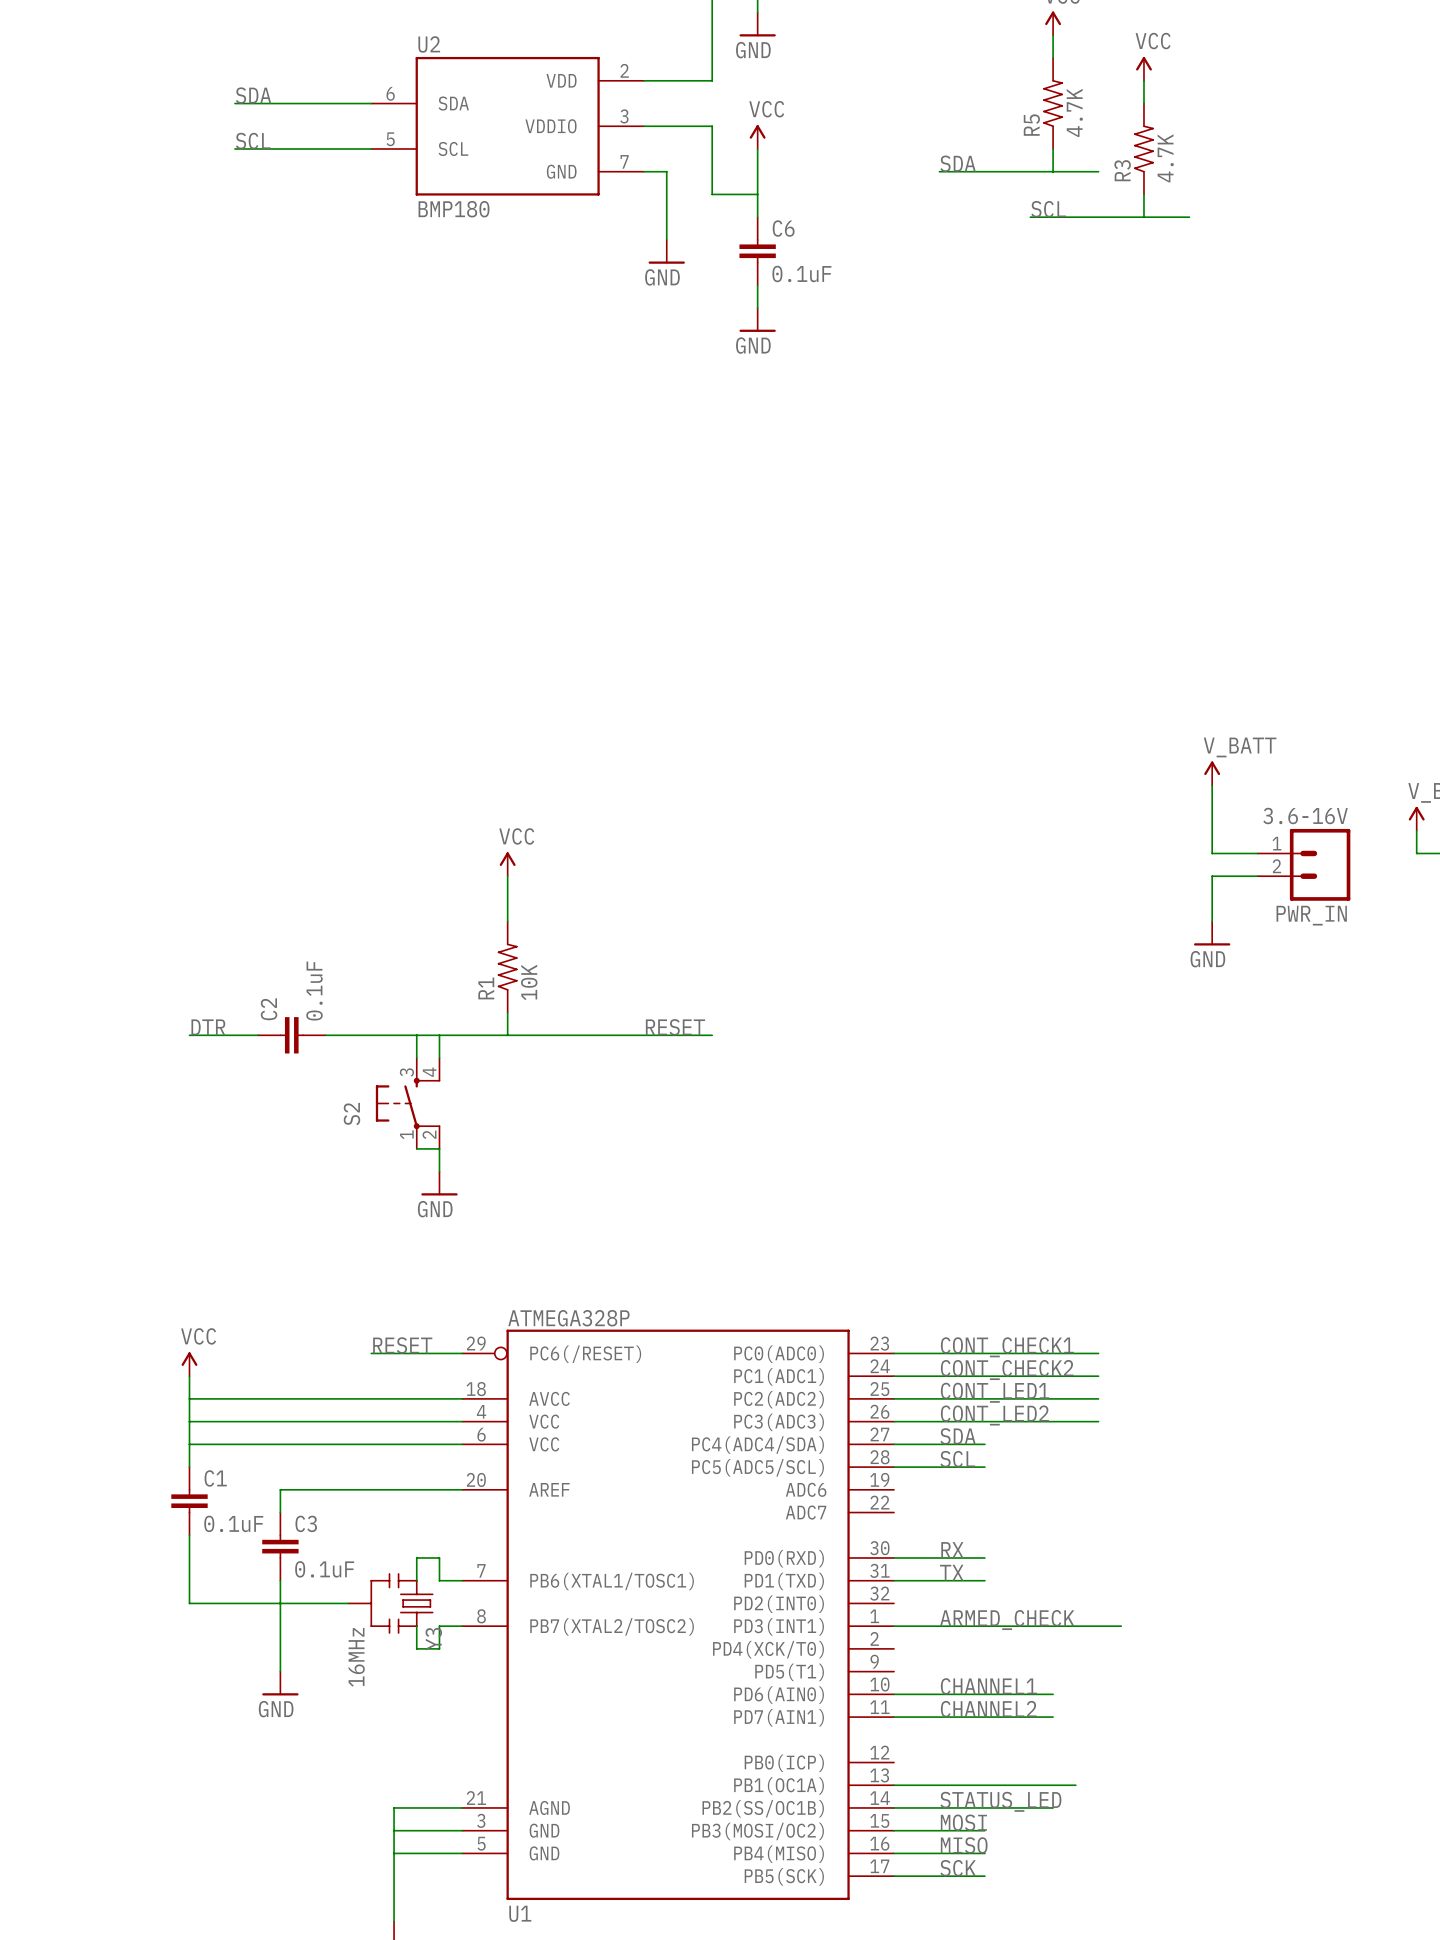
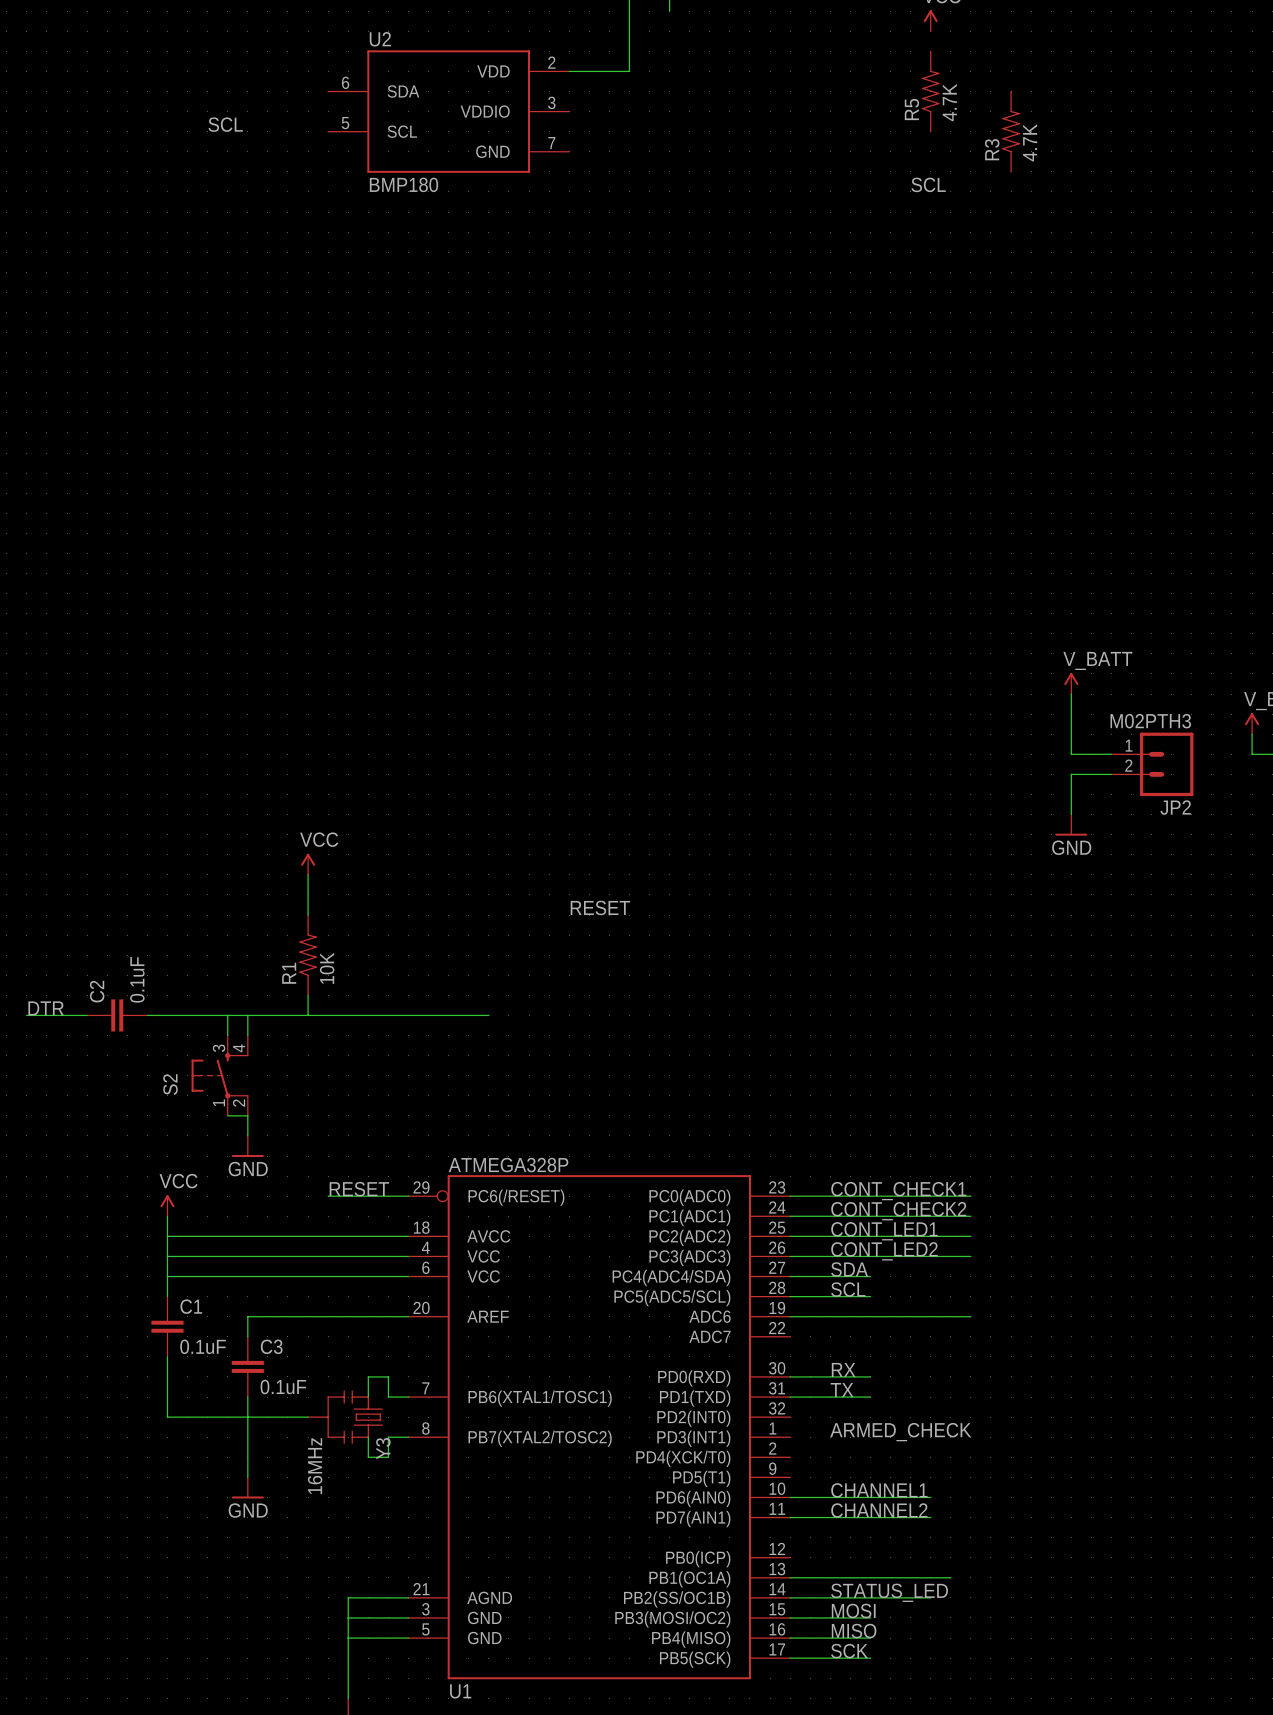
power symbol: GND (757, 24) -> none
wire: (1053, 35) (1053, 58) -> none
power symbol: VCC (1143, 68) -> none
wire: (1143, 80) (1143, 103) -> none
label: SDA (253, 95) -> none
wire: (234, 103) (371, 103) -> none
wire: (644, 126) (712, 126) (712, 194) (757, 194) -> none
power symbol: VCC (757, 137) -> none
wire: (234, 148) (371, 148) -> none
wire: (757, 148) (757, 217) -> none
wire: (1053, 148) (1053, 171) -> none
label: SDA (958, 163) -> none
wire: (644, 171) (666, 171) (666, 239) -> none
wire: (939, 171) (1098, 171) -> none
wire: (1143, 194) (1143, 217) -> none
wire: (1030, 217) (1189, 217) -> none
power symbol: GND (666, 251) -> none
C6: 0.1uF (757, 251) -> none
wire: (757, 285) (757, 308) -> none
power symbol: GND (757, 320) -> none
PWR_IN value: 3.6-16V (1305, 815) -> M02PTH3 (1150, 721)
power symbol position: VCC (507, 864) -> VCC (308, 864)
wire: (507, 876) (507, 921) -> (308, 874) (308, 915)
PWR_IN name: PWR_IN (1311, 915) -> JP2 (1175, 807)
R1 position: (507, 967) -> (308, 955)
wire: (507, 1012) (507, 1035) -> (308, 995) (308, 1015)
label position: DTR (208, 1027) -> DTR (46, 1008)
wire: (189, 1035) (257, 1035) -> (26, 1015) (87, 1015)
C2 position: (291, 1035) -> (117, 1015)
wire: (325, 1035) (712, 1035) -> none
wire: (416, 1035) (416, 1058) -> (227, 1015) (227, 1035)
wire: (439, 1035) (439, 1058) -> (247, 1015) (247, 1035)
S2 position: (408, 1103) -> (220, 1075)
wire: none -> (147, 1015) (368, 1015)
wire: (439, 1148) (439, 1171) -> (388, 1015) (488, 1015)
power symbol position: GND (439, 1183) -> GND (247, 1146)
wire: none -> (227, 1115) (247, 1115) (247, 1135)
wire: none -> (790, 1316) (970, 1316)
wire: (894, 1626) (1121, 1626) -> none

